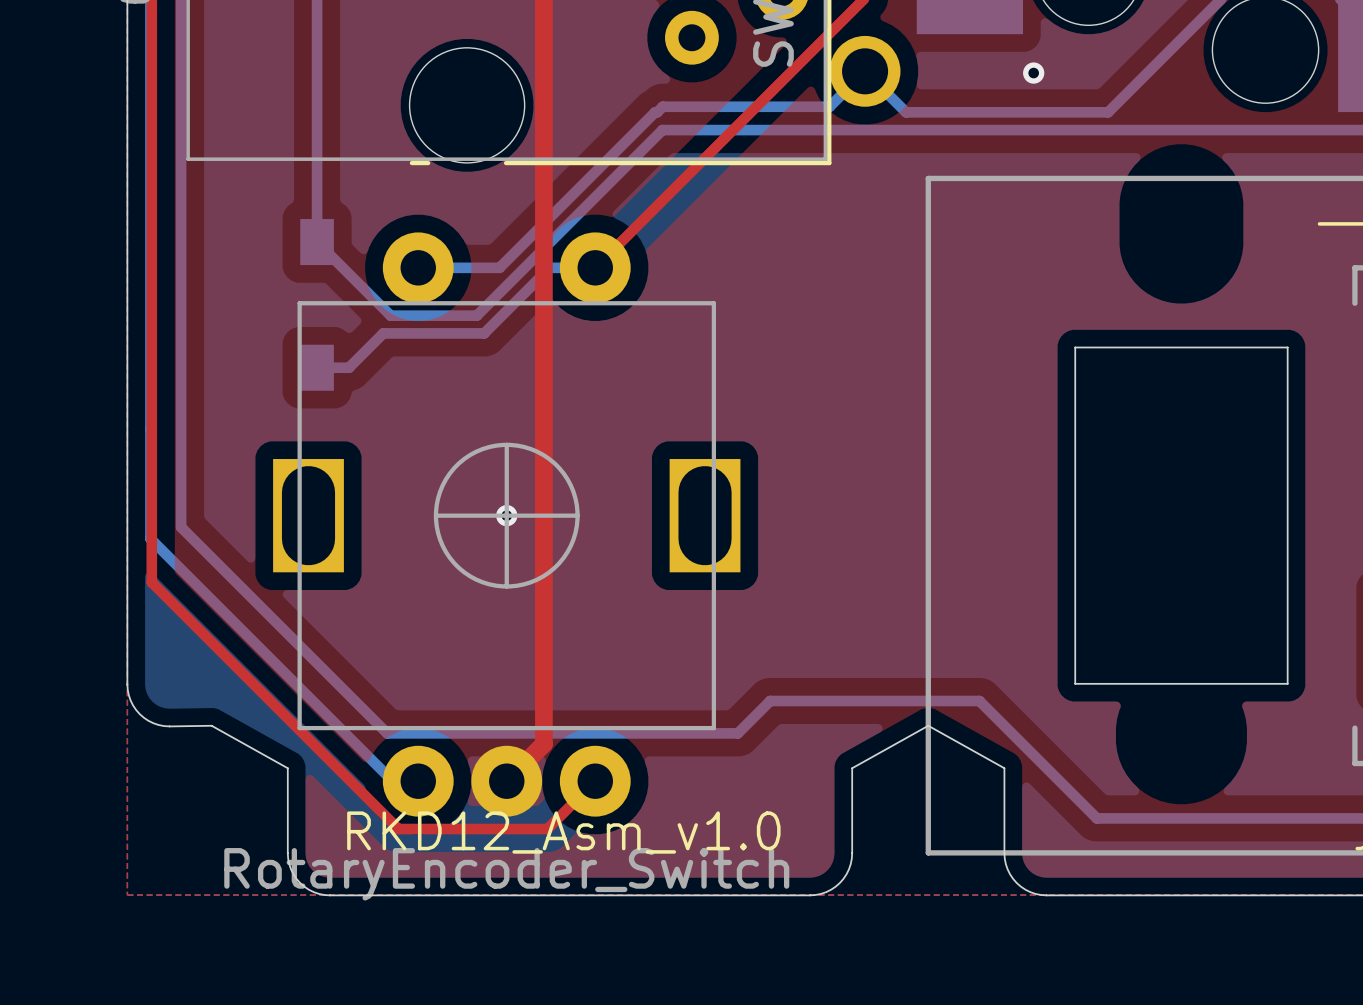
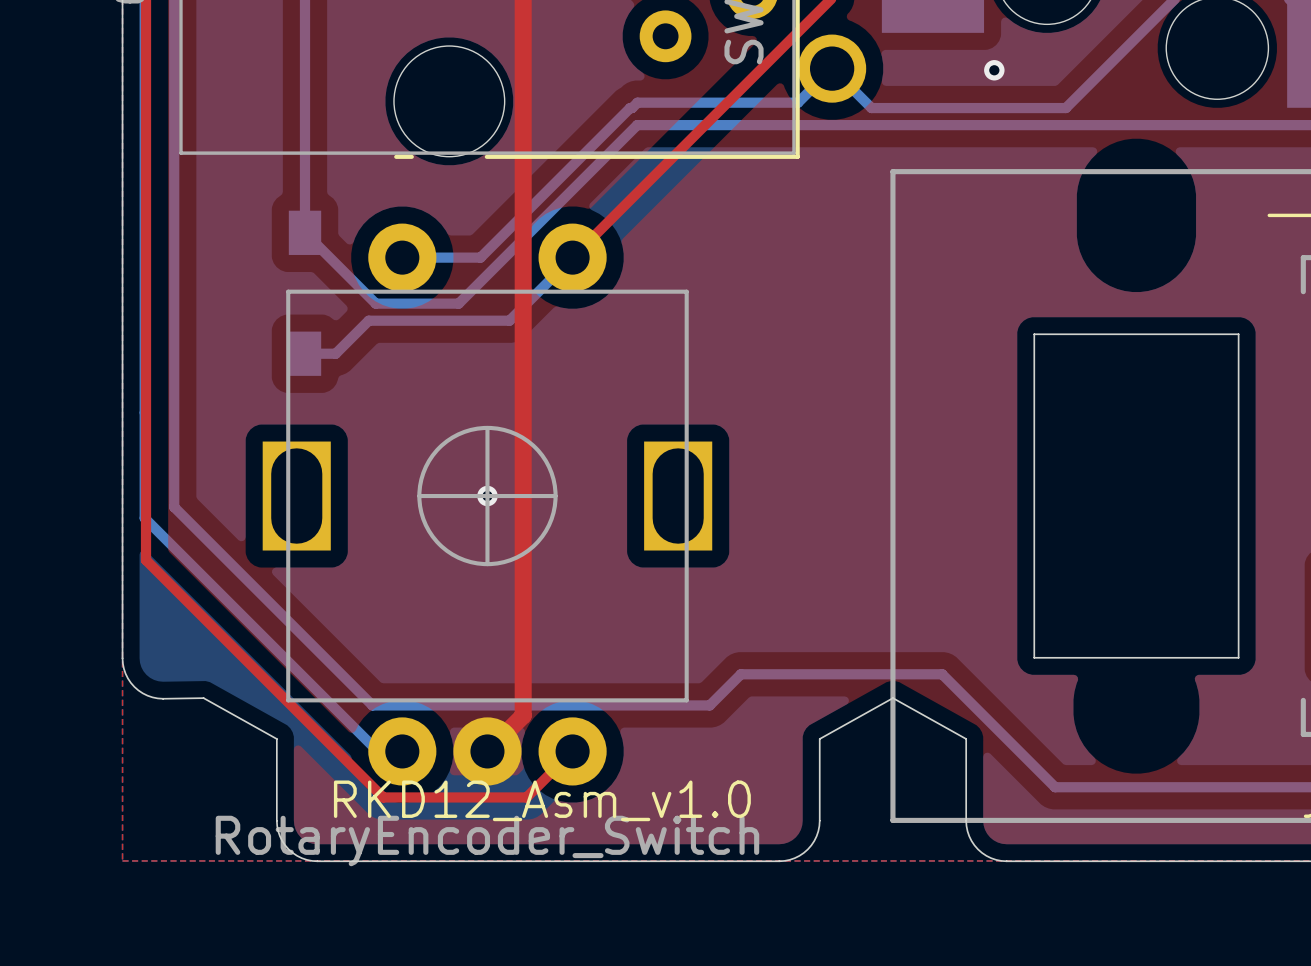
bottom track: (595, 267) (549, 267) (484, 333) -> (572, 257) (509, 320) (465, 320)

